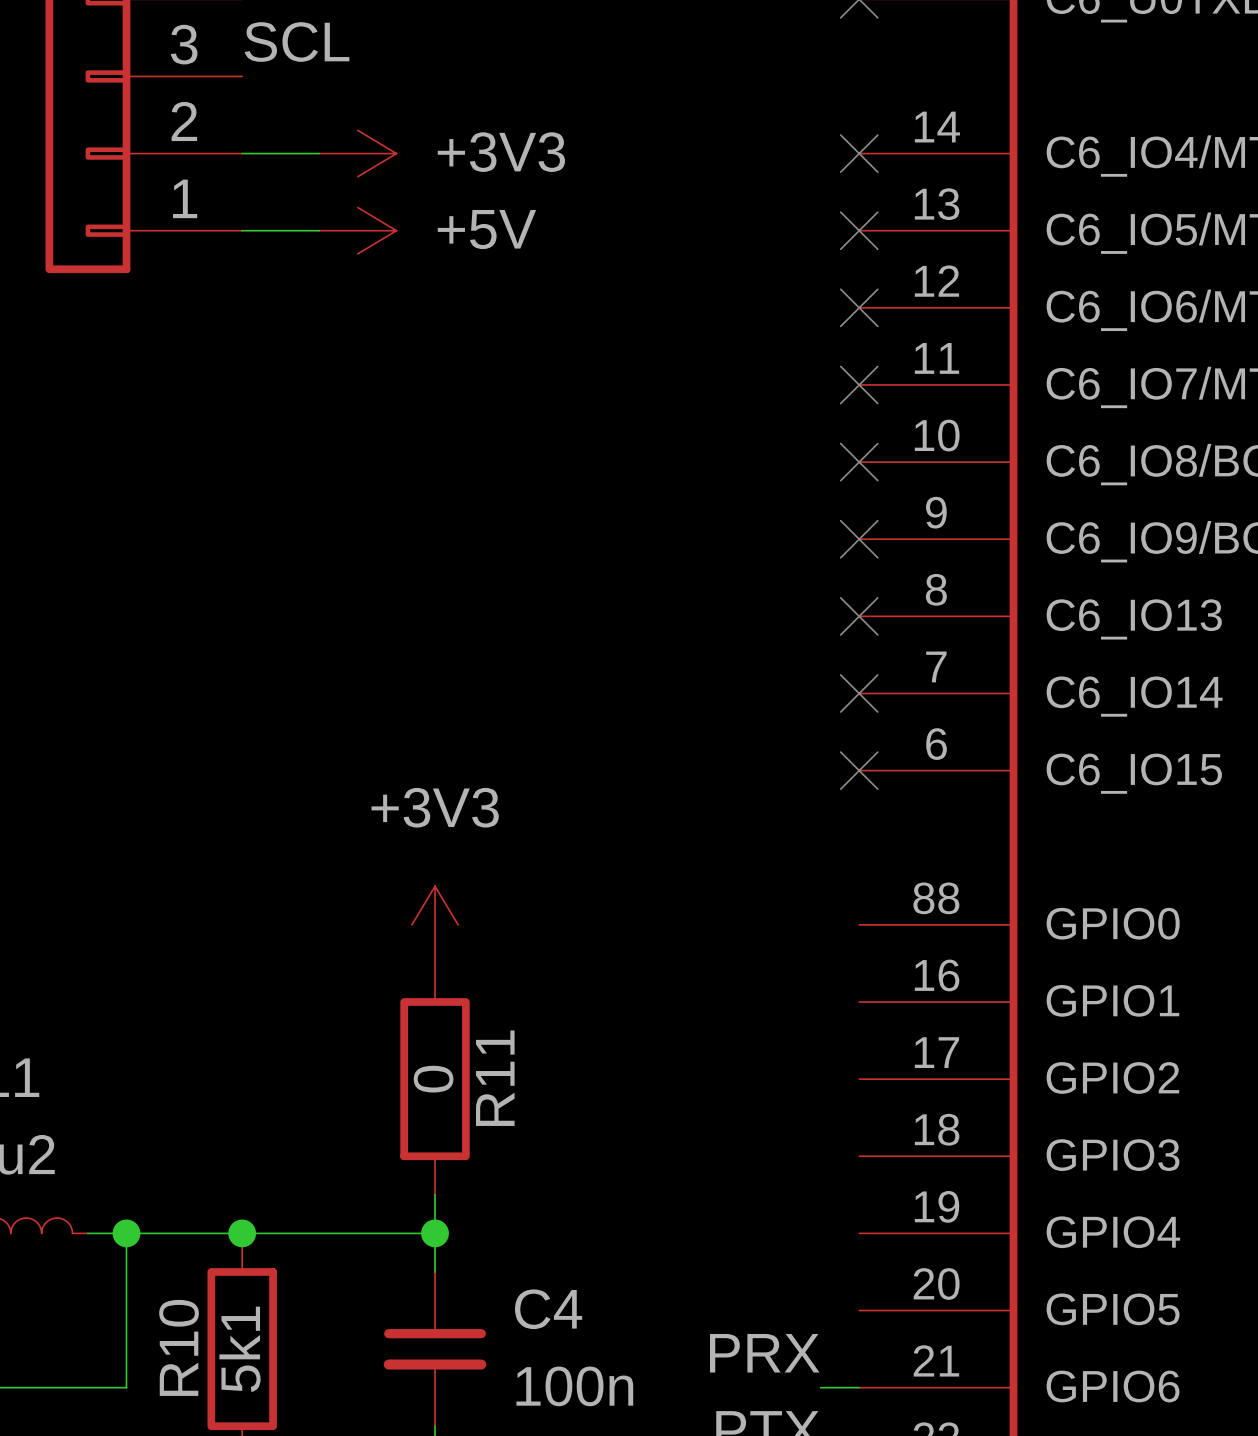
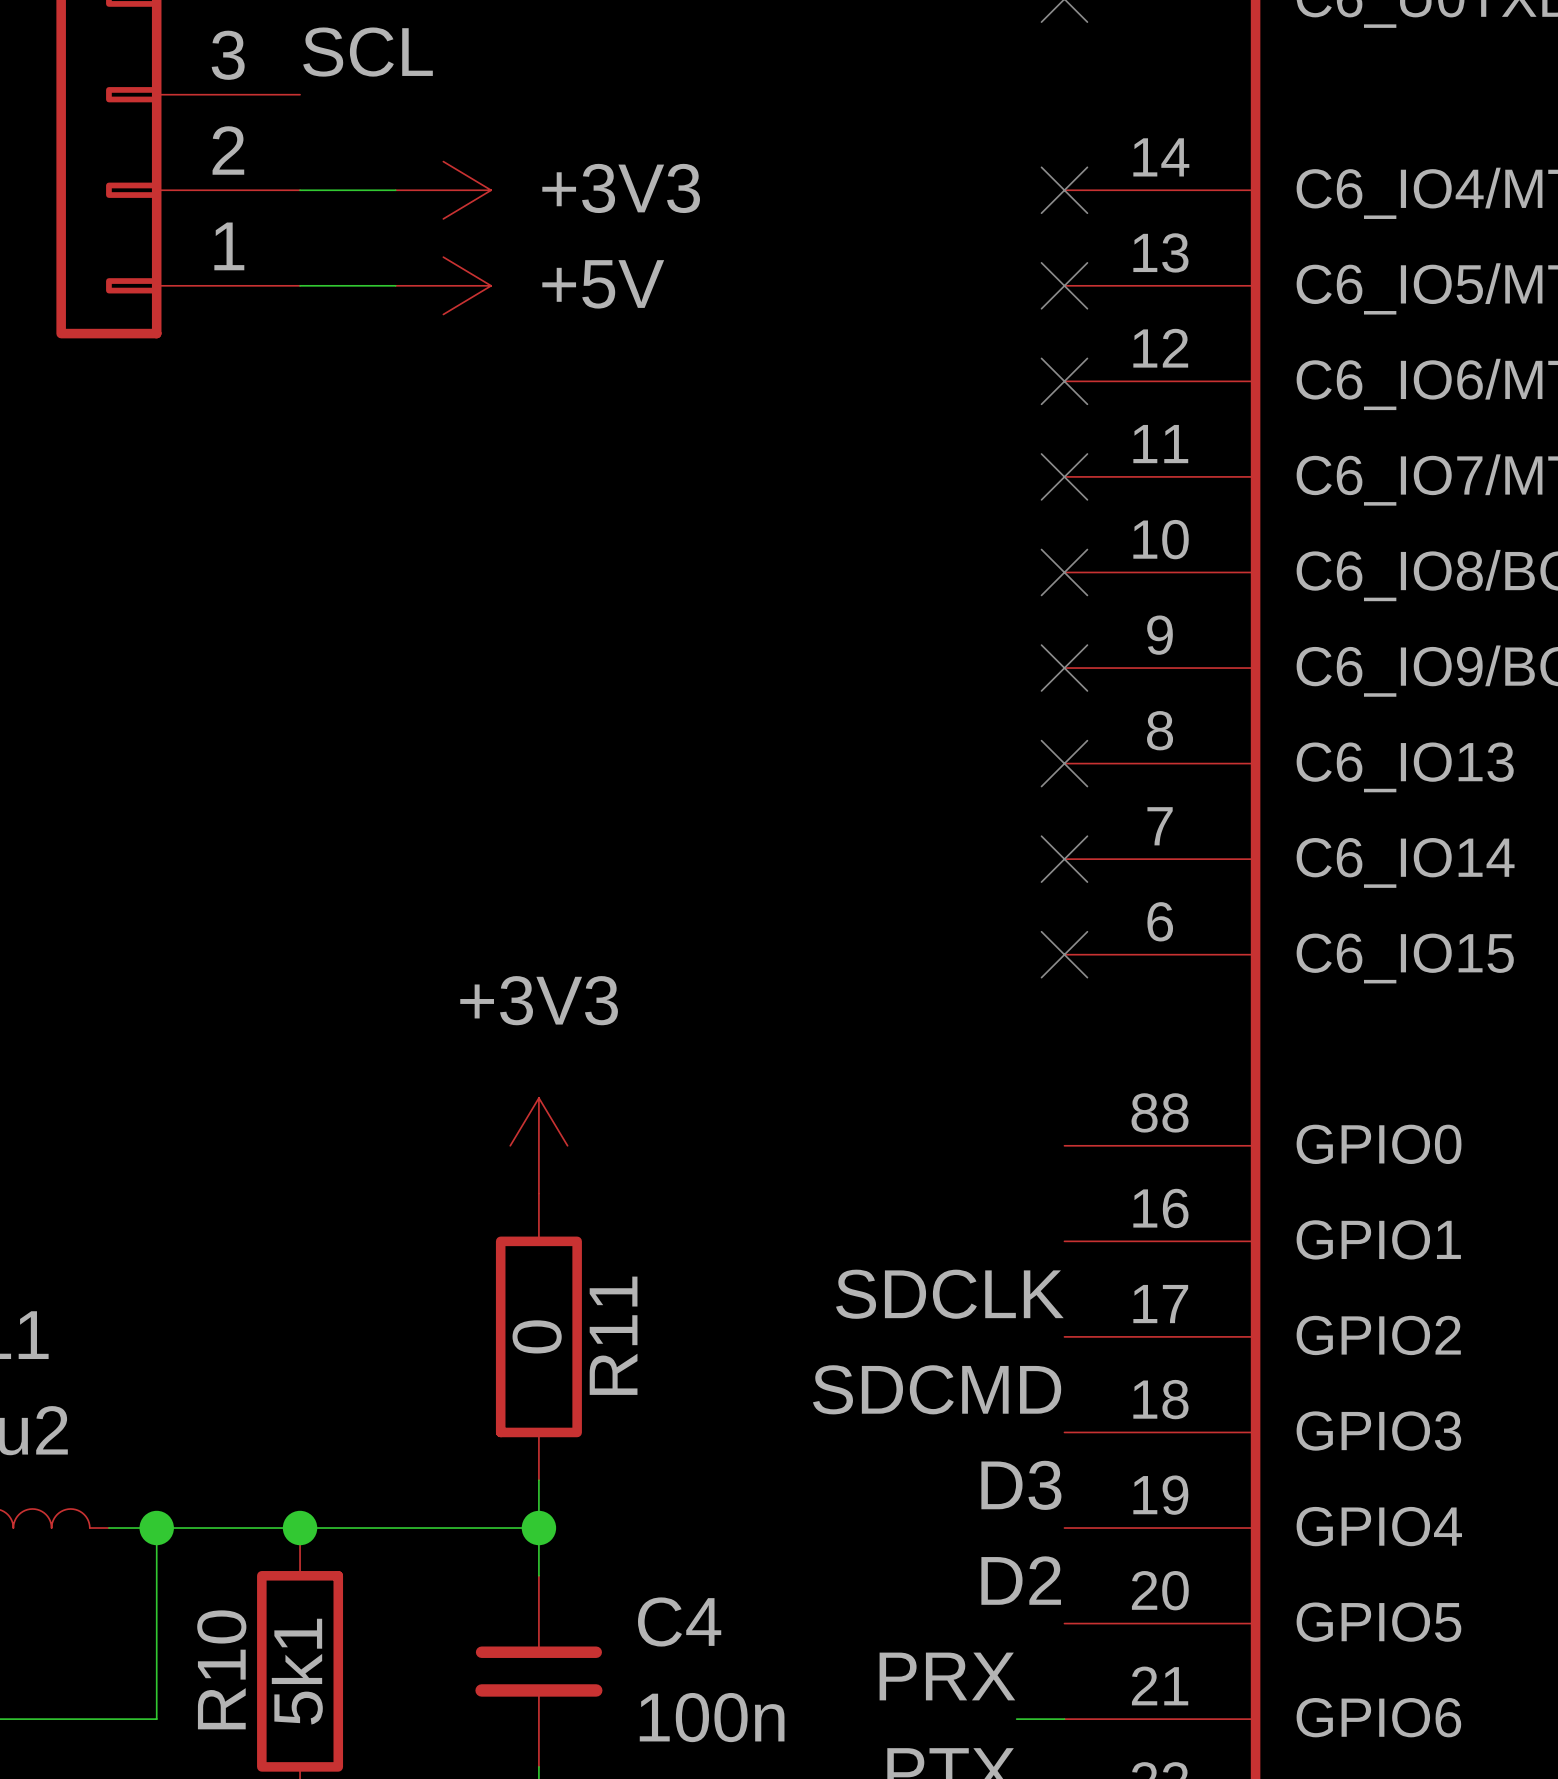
label: none -> SDCLK (949, 1294)
label: none -> SDCMD (937, 1389)
label: none -> D3 (1021, 1485)
label: none -> D2 (1021, 1580)

